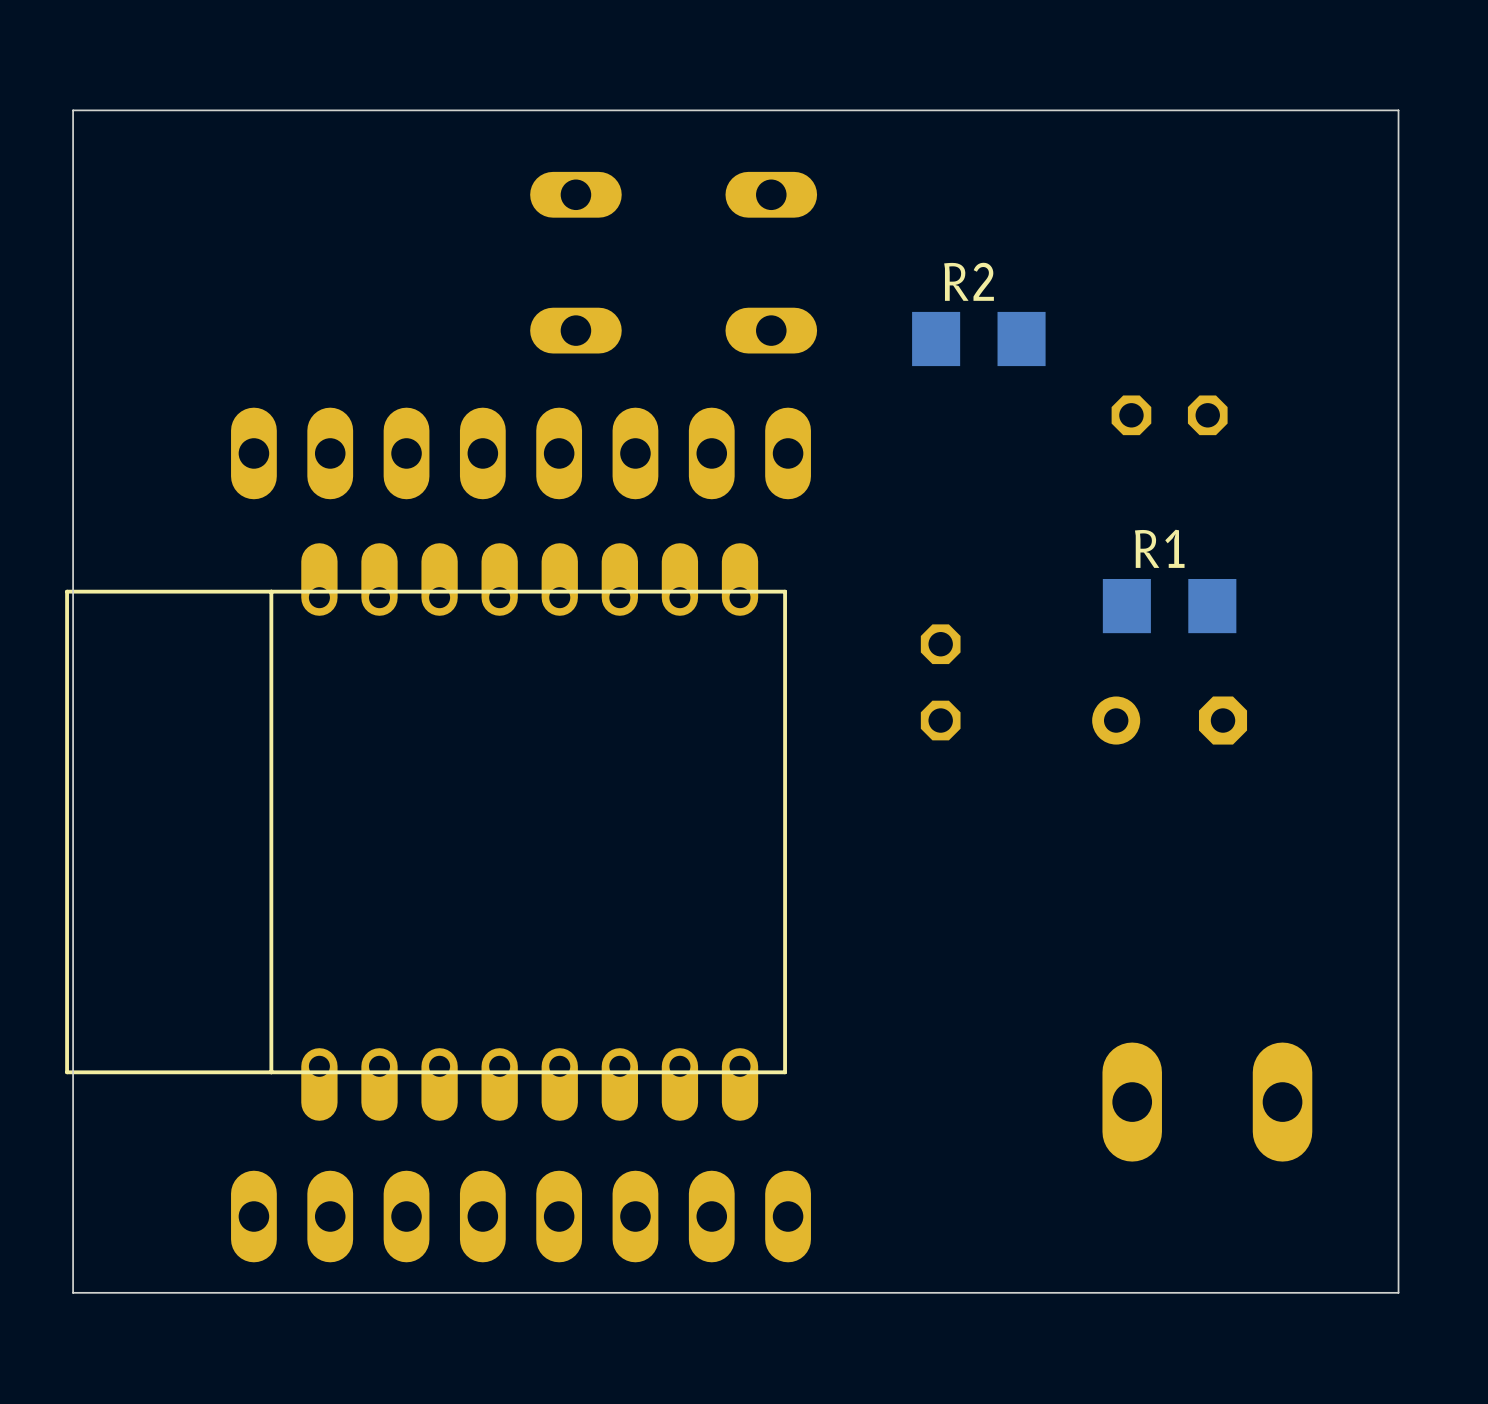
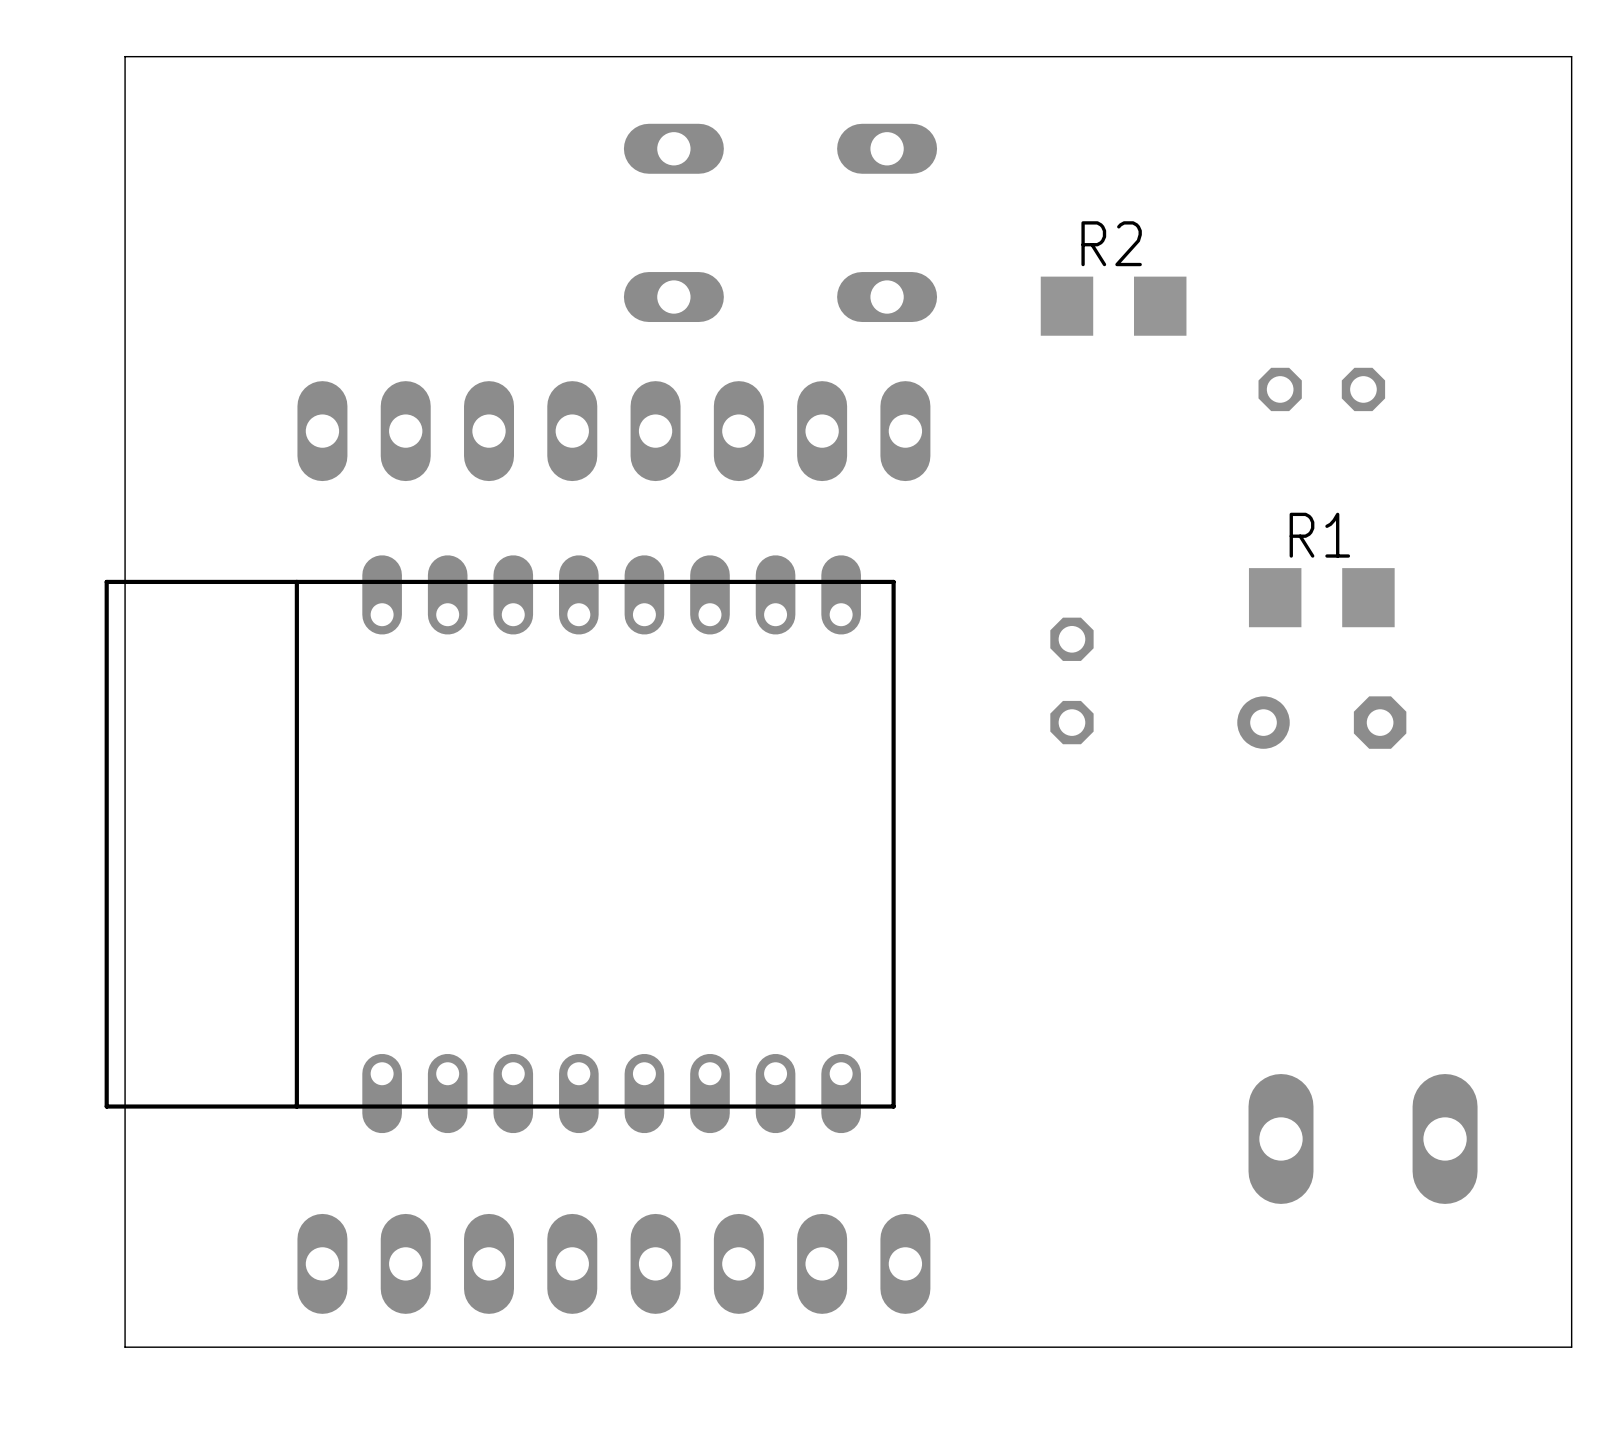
part footprint: [65, 543, 787, 1121] -> [104, 555, 896, 1134]

